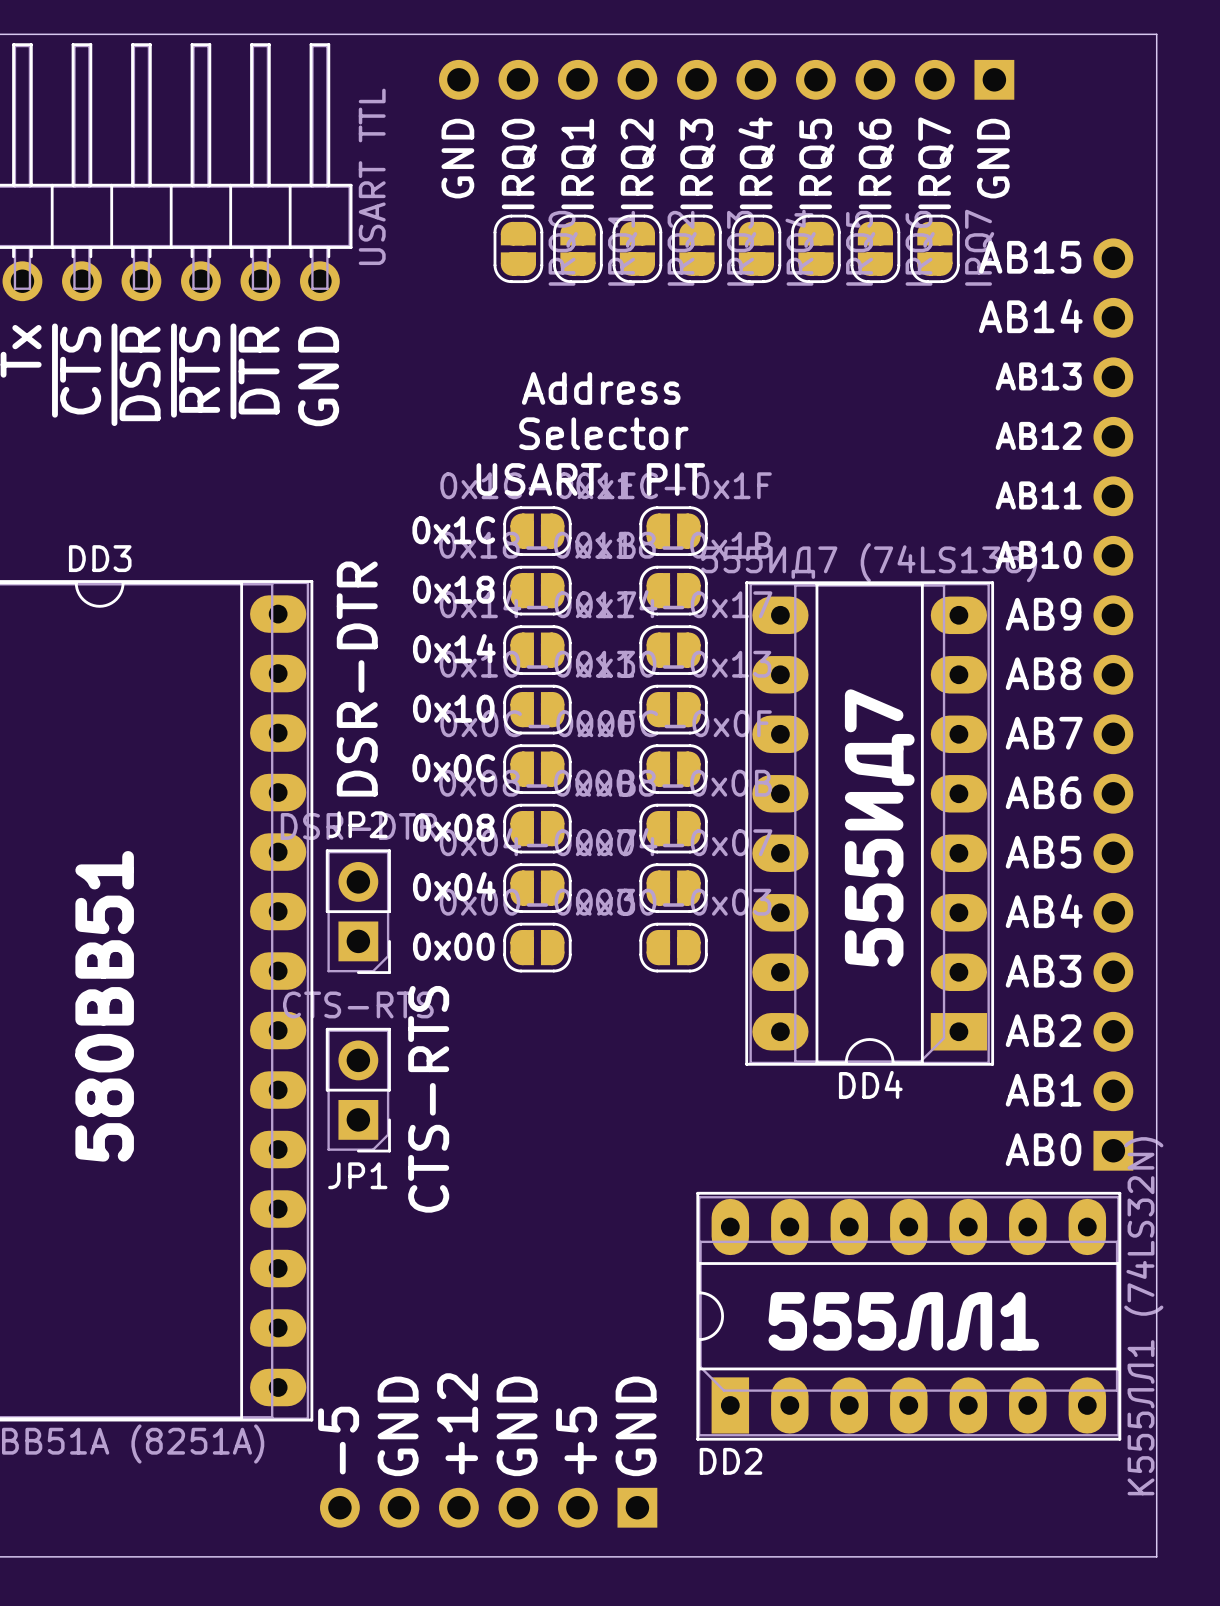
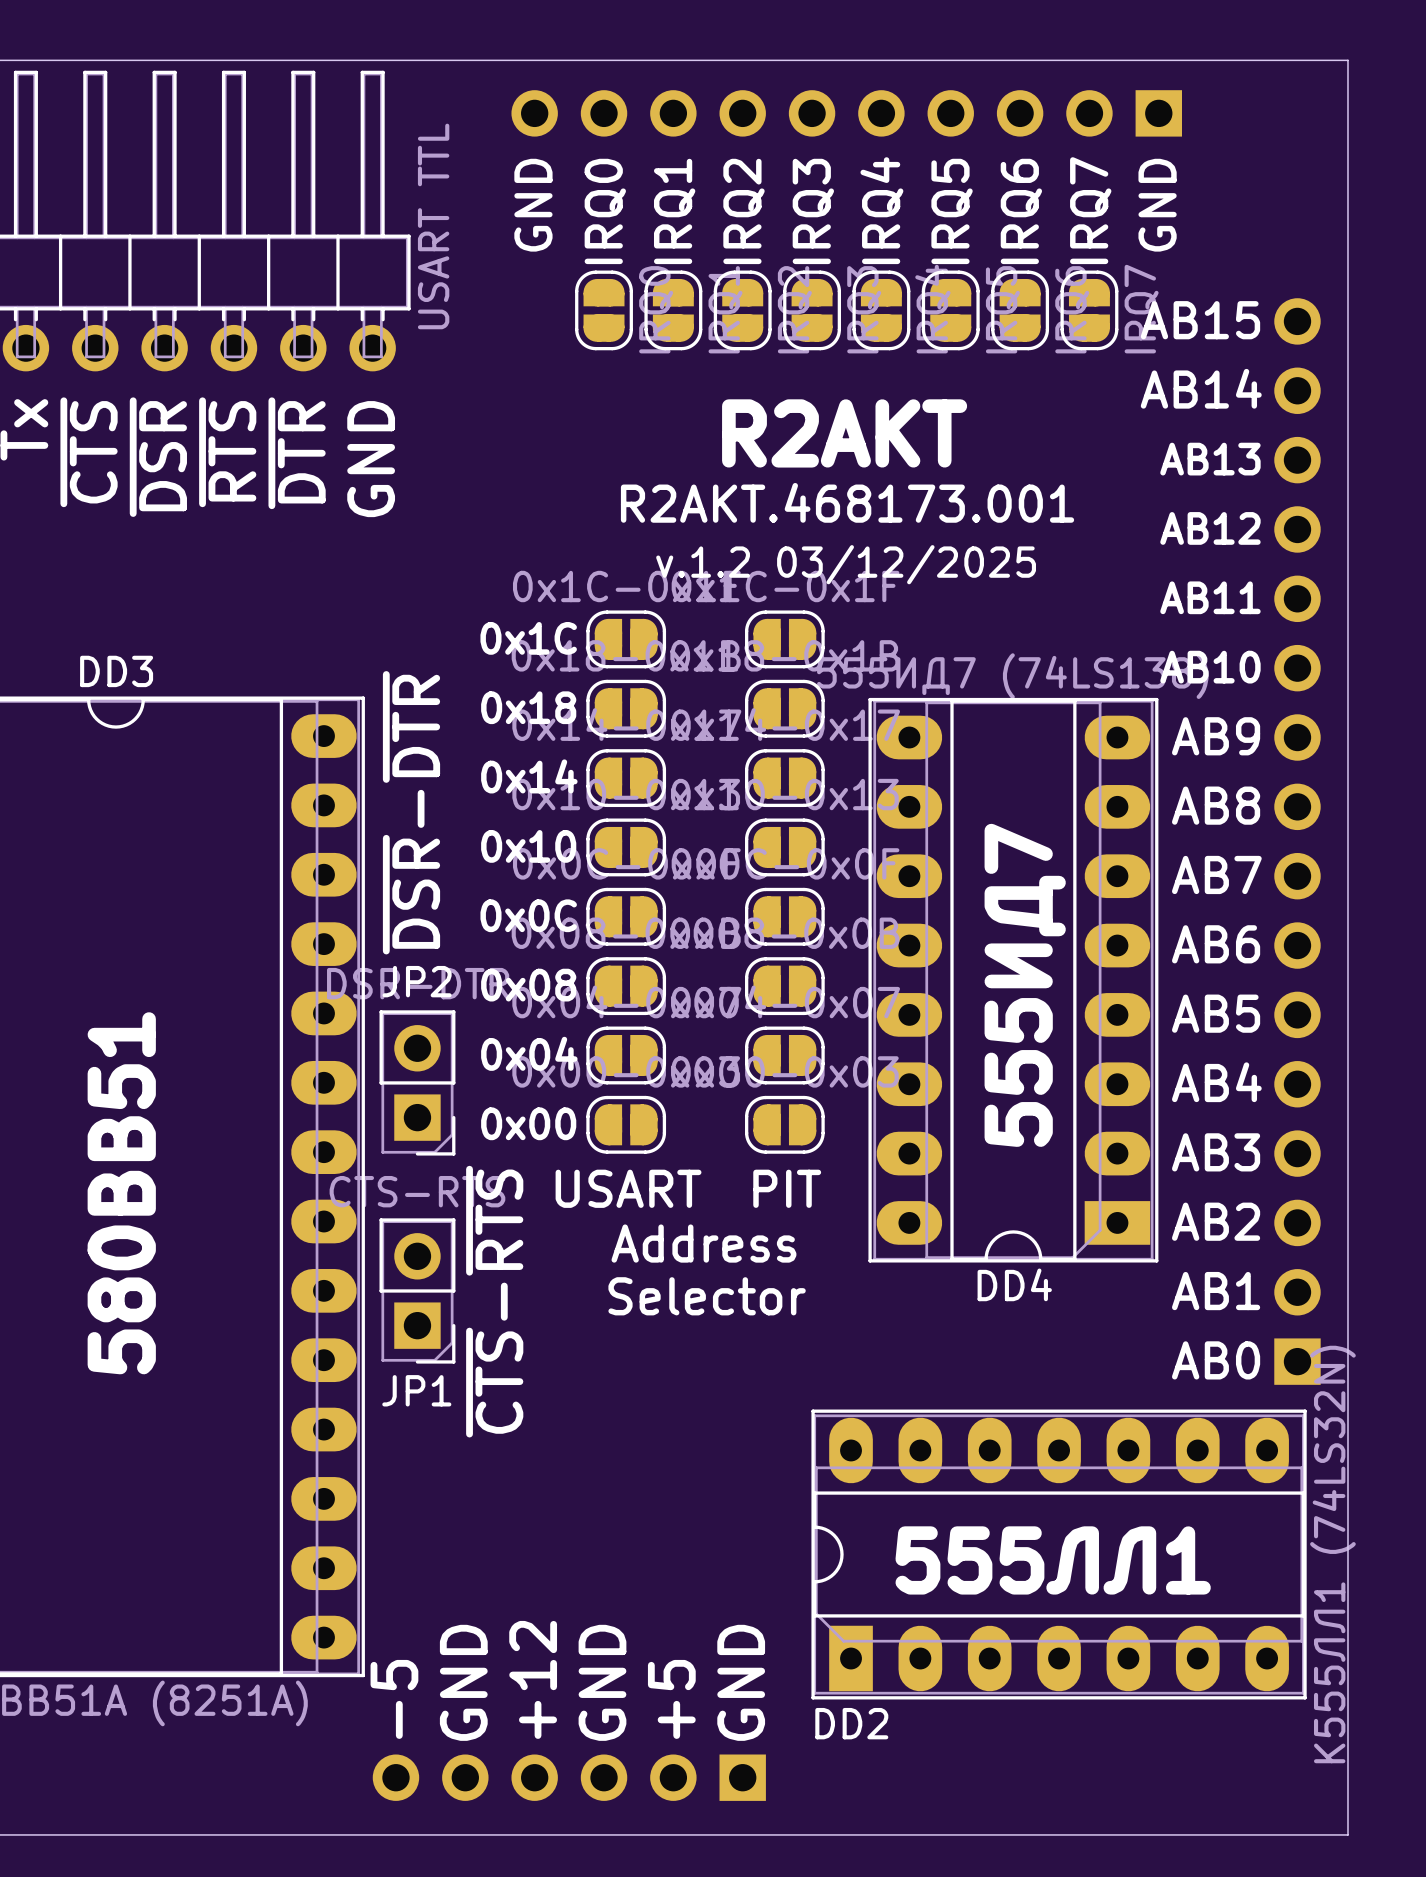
text: Address (601, 388) -> R2AKT (844, 433)
text: none -> R2AKT.468173.001 (847, 502)
text: Selector (603, 433) -> none
text: none -> v.1.2 03/12/2025 (846, 564)
text position: USART (539, 479) -> USART (628, 1188)
text position: PIT (675, 479) -> PIT (787, 1188)
text: DSR-DTR (357, 679) -> ~{DSR}-~{DTR} (411, 812)
text: none -> Address (703, 1243)
text: none -> Selector (707, 1296)
text: CTS-RTS (428, 1099) -> ~{CTS}-~{RTS} (494, 1301)

